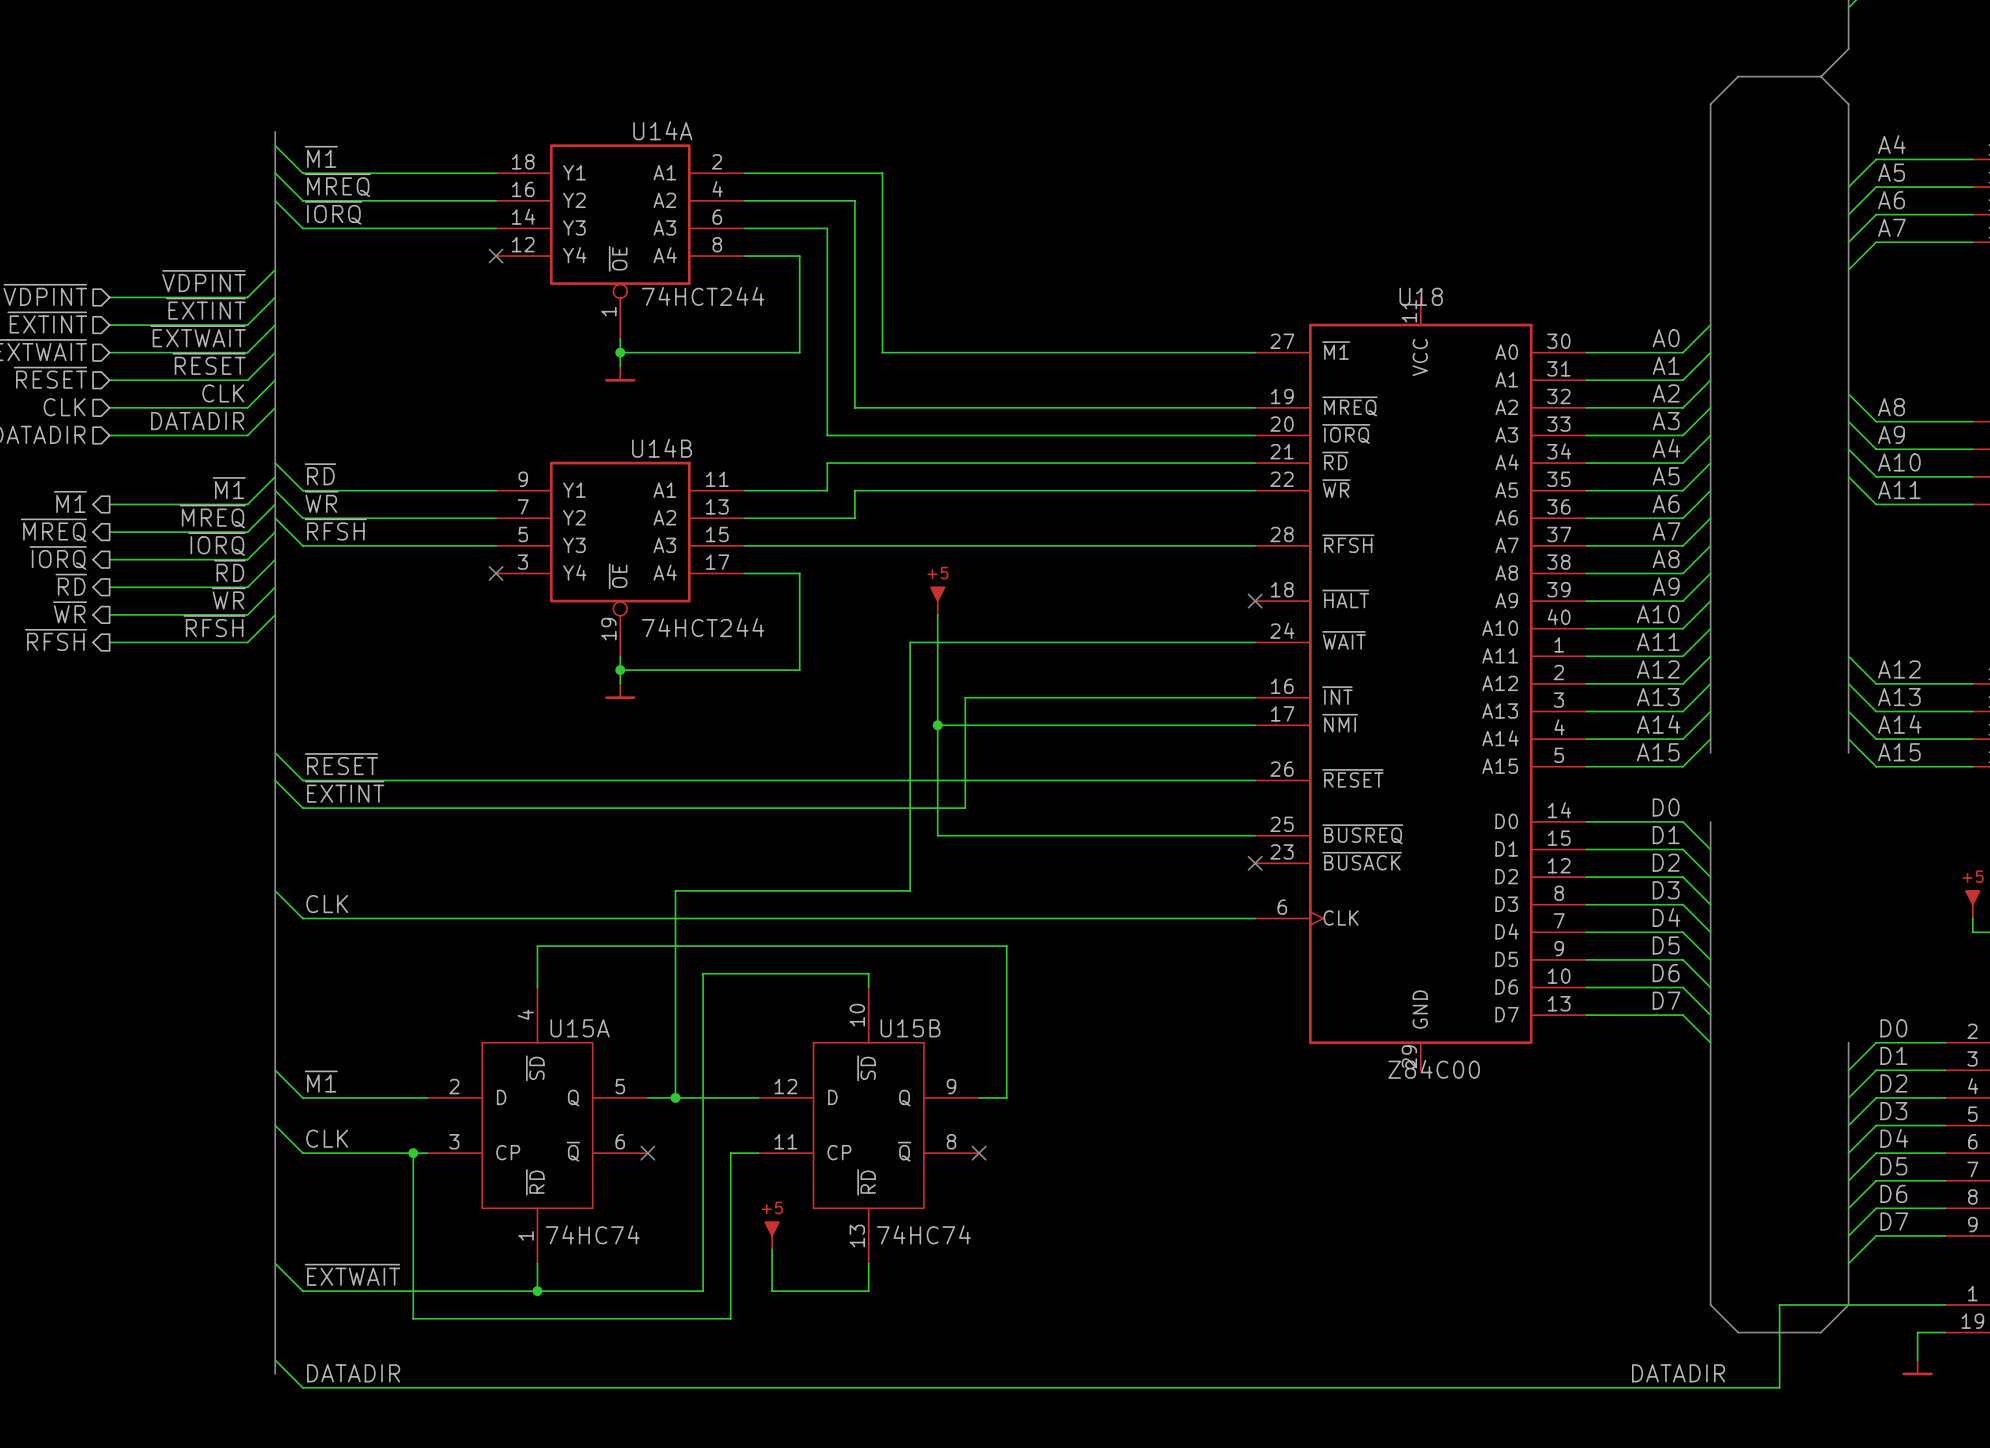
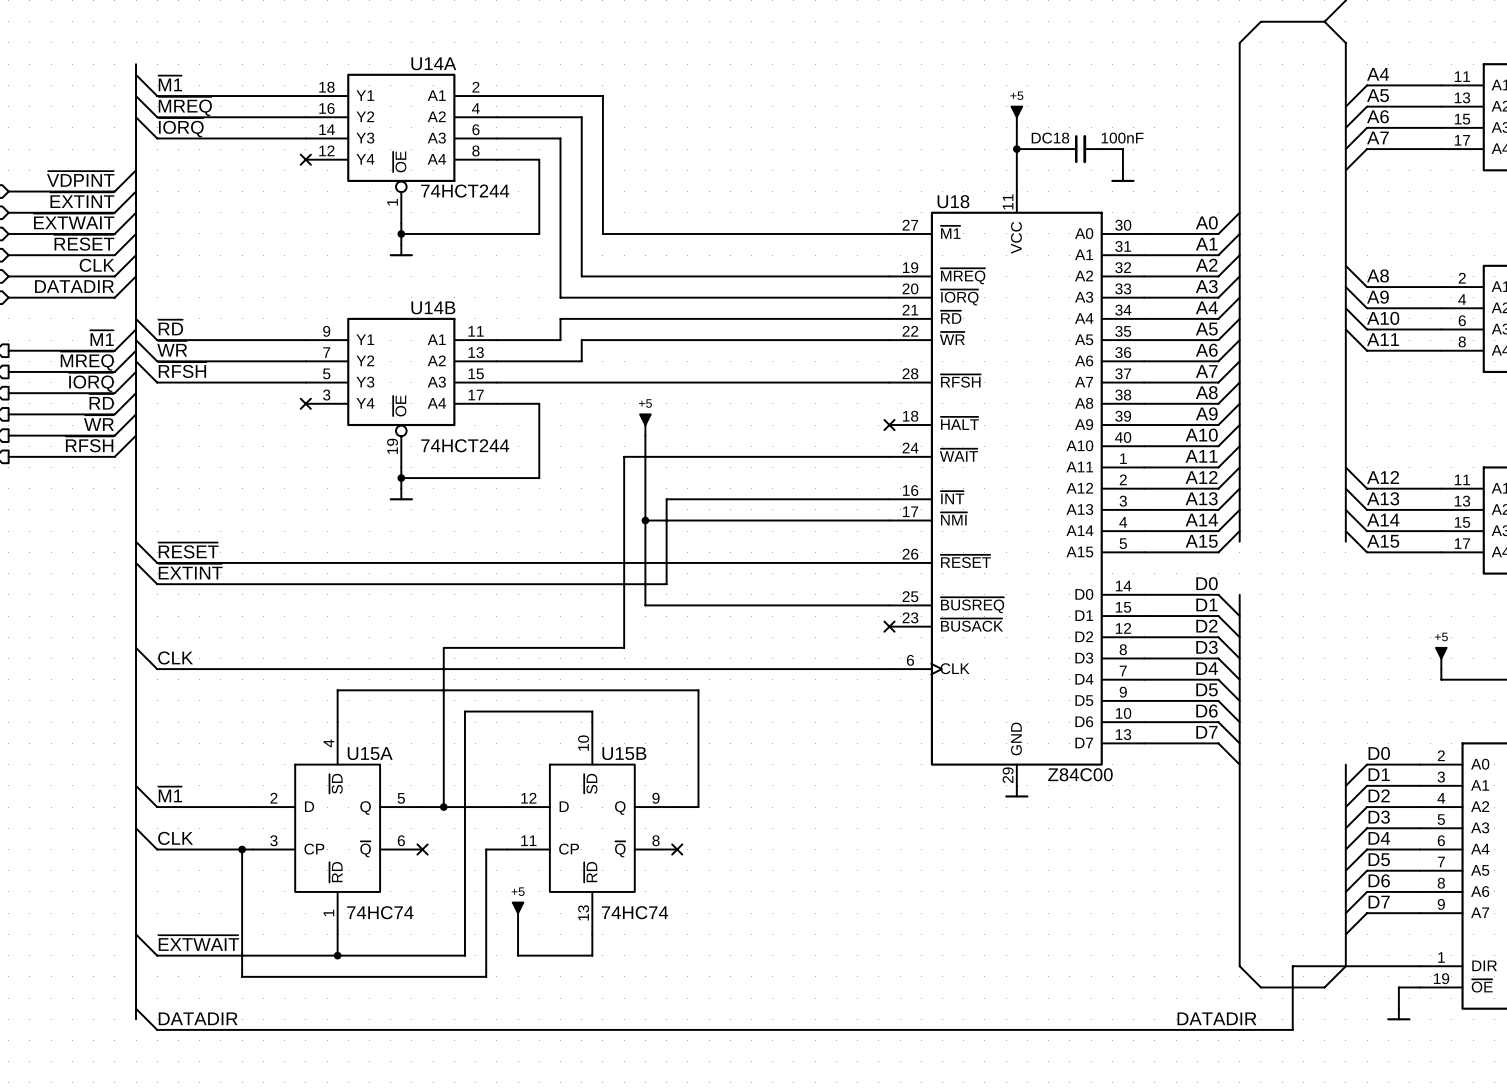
power symbol: none -> (1016, 117)
wire: none -> (1016, 127) (1016, 191)
wire: none -> (1016, 149) (1059, 149)
junction: none -> (1016, 149)
DC18: none -> 100nF (1080, 149)
wire: none -> (1101, 149) (1122, 149) (1122, 170)
power symbol: none -> (1122, 176)
U18 name position: U18 (1421, 296) -> U18 (953, 201)
U18 value position: Z84C00 (1434, 1069) -> Z84C00 (1080, 774)
power symbol: none -> (1016, 791)

